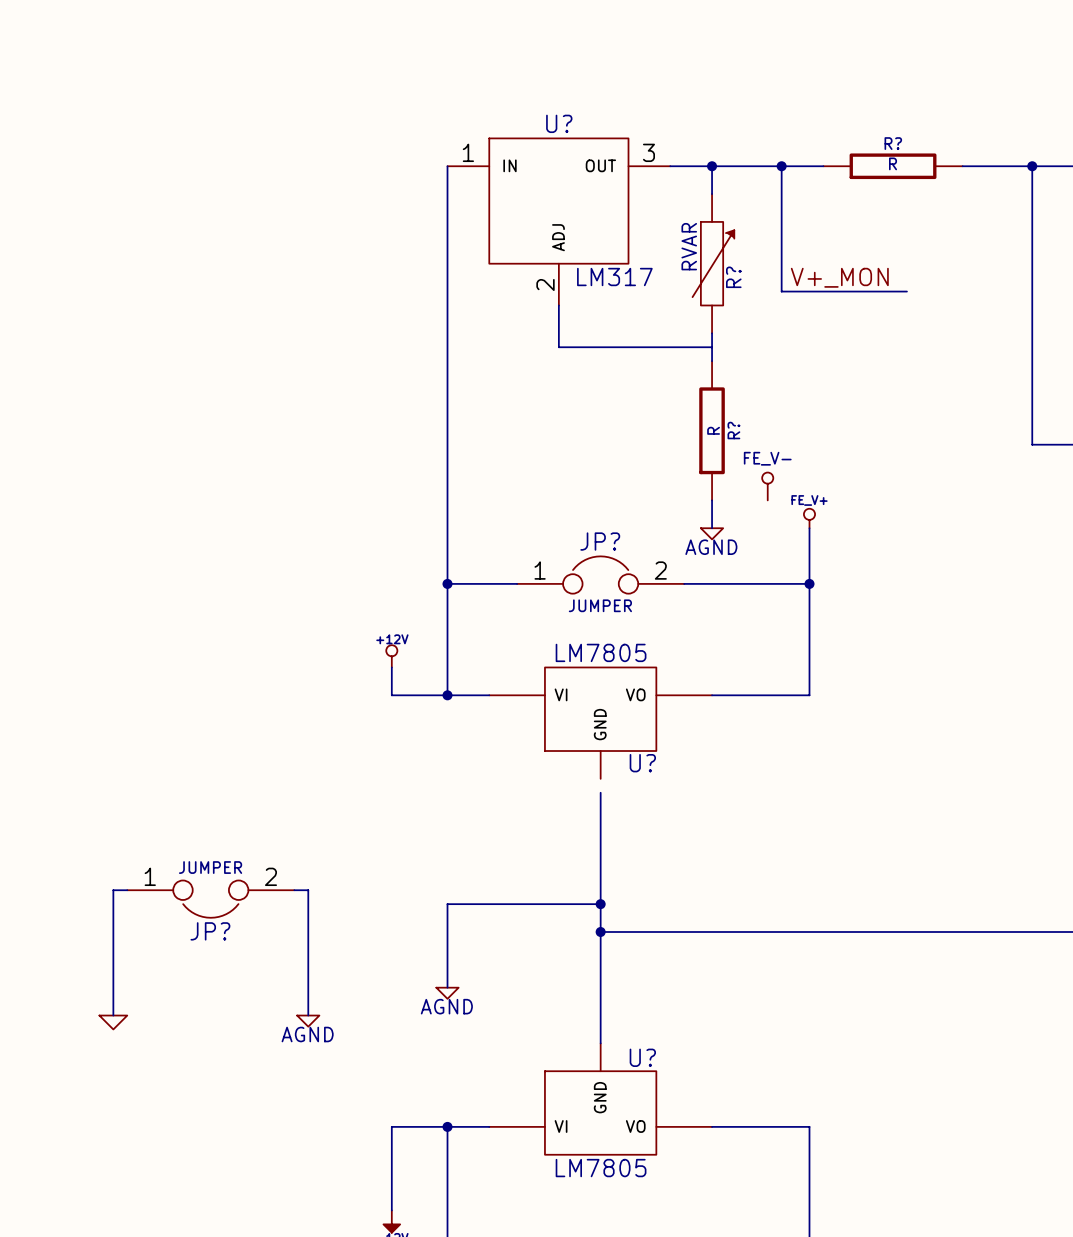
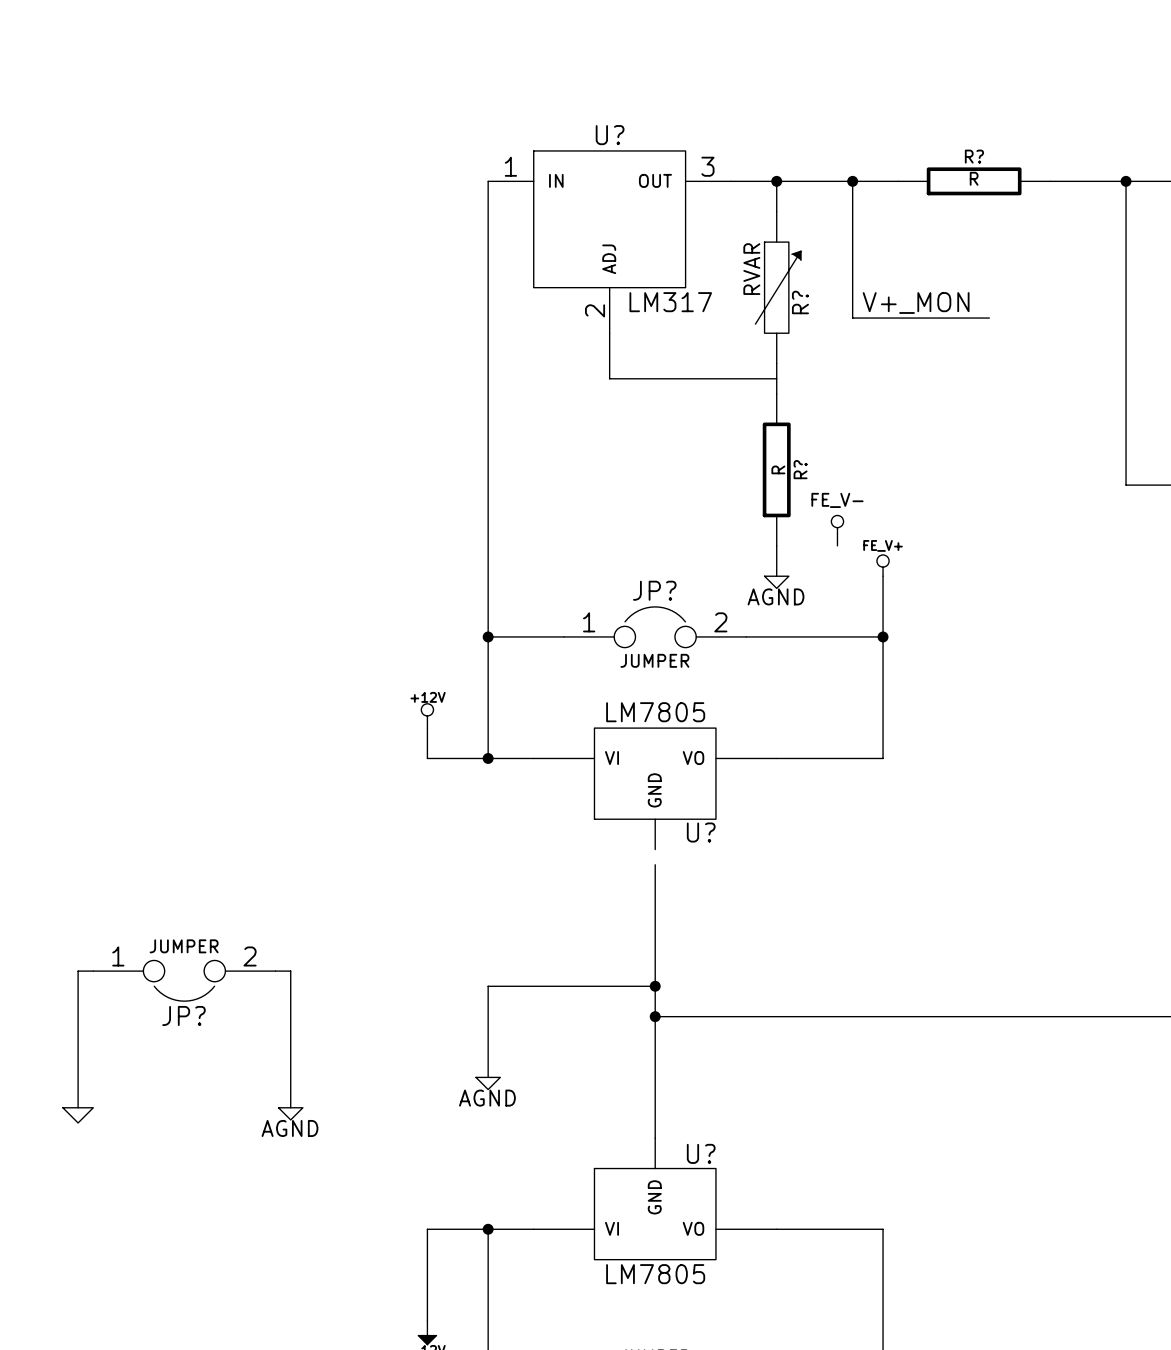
wire: (127, 890) (113, 890) (113, 1015) -> (93, 971) (78, 971) (78, 1107)
wire: (294, 890) (308, 890) (308, 1015) -> (275, 971) (290, 971) (290, 1107)
JP? position: (210, 899) -> (184, 980)
power symbol position: AGND (308, 1021) -> AGND (290, 1113)
power symbol position: (113, 1022) -> (78, 1115)

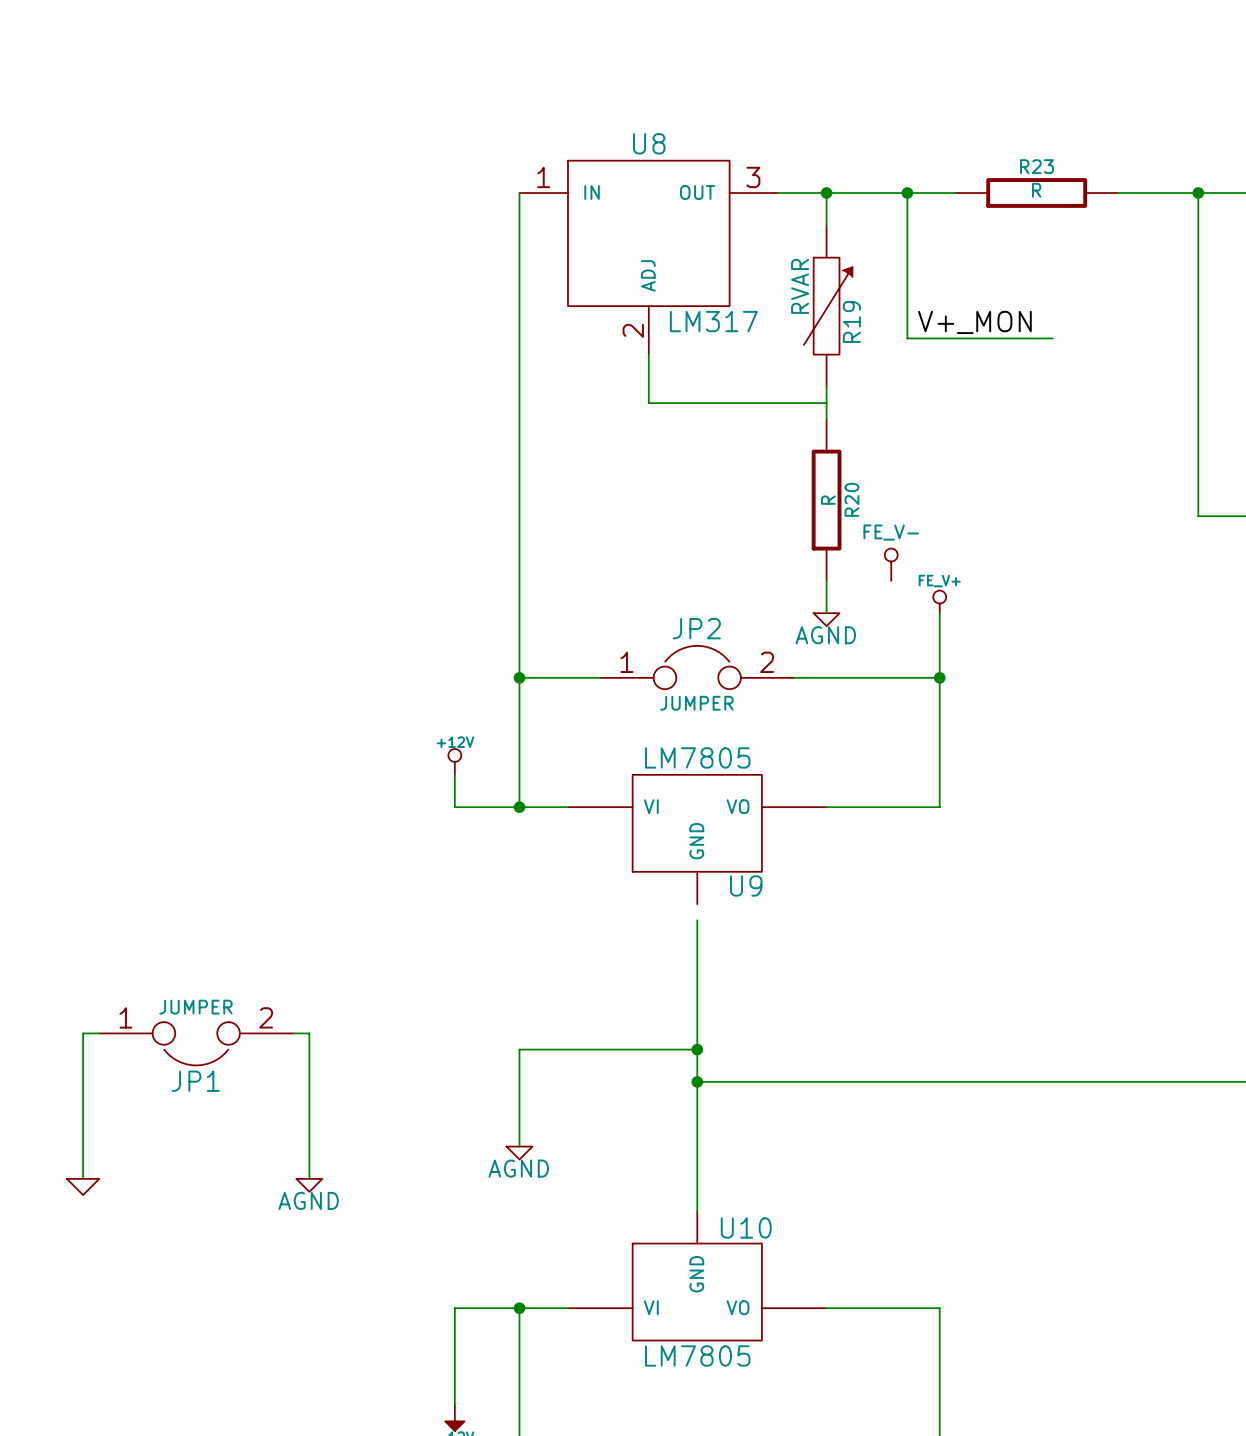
U? name: U? (610, 135) -> U8 (649, 143)
R? name: R? (974, 156) -> R23 (1037, 166)
R? name: R? (800, 302) -> R19 (851, 321)
R? name: R? (800, 469) -> R20 (851, 499)
JP? name: JP? (654, 590) -> JP2 (696, 628)
U? name: U? (701, 832) -> U9 (746, 885)
JP? name: JP? (183, 1015) -> JP1 (195, 1081)
U? name: U? (701, 1153) -> U10 (746, 1227)

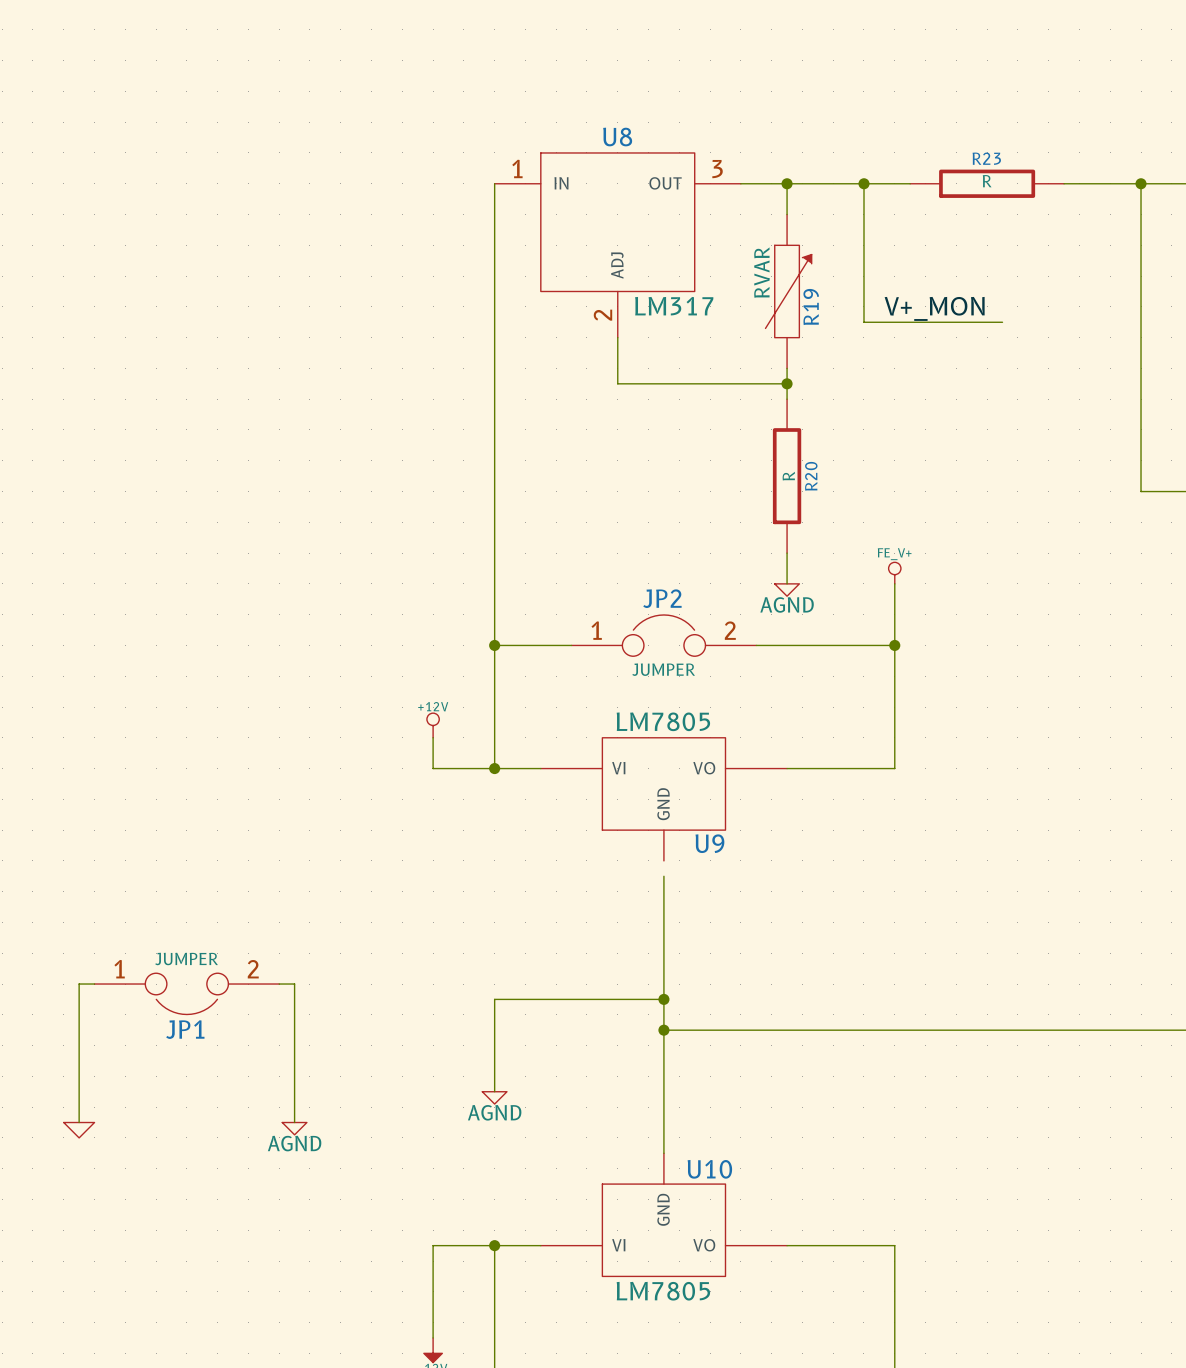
junction: none -> (787, 383)
power symbol: FE_V- (891, 564) -> none

